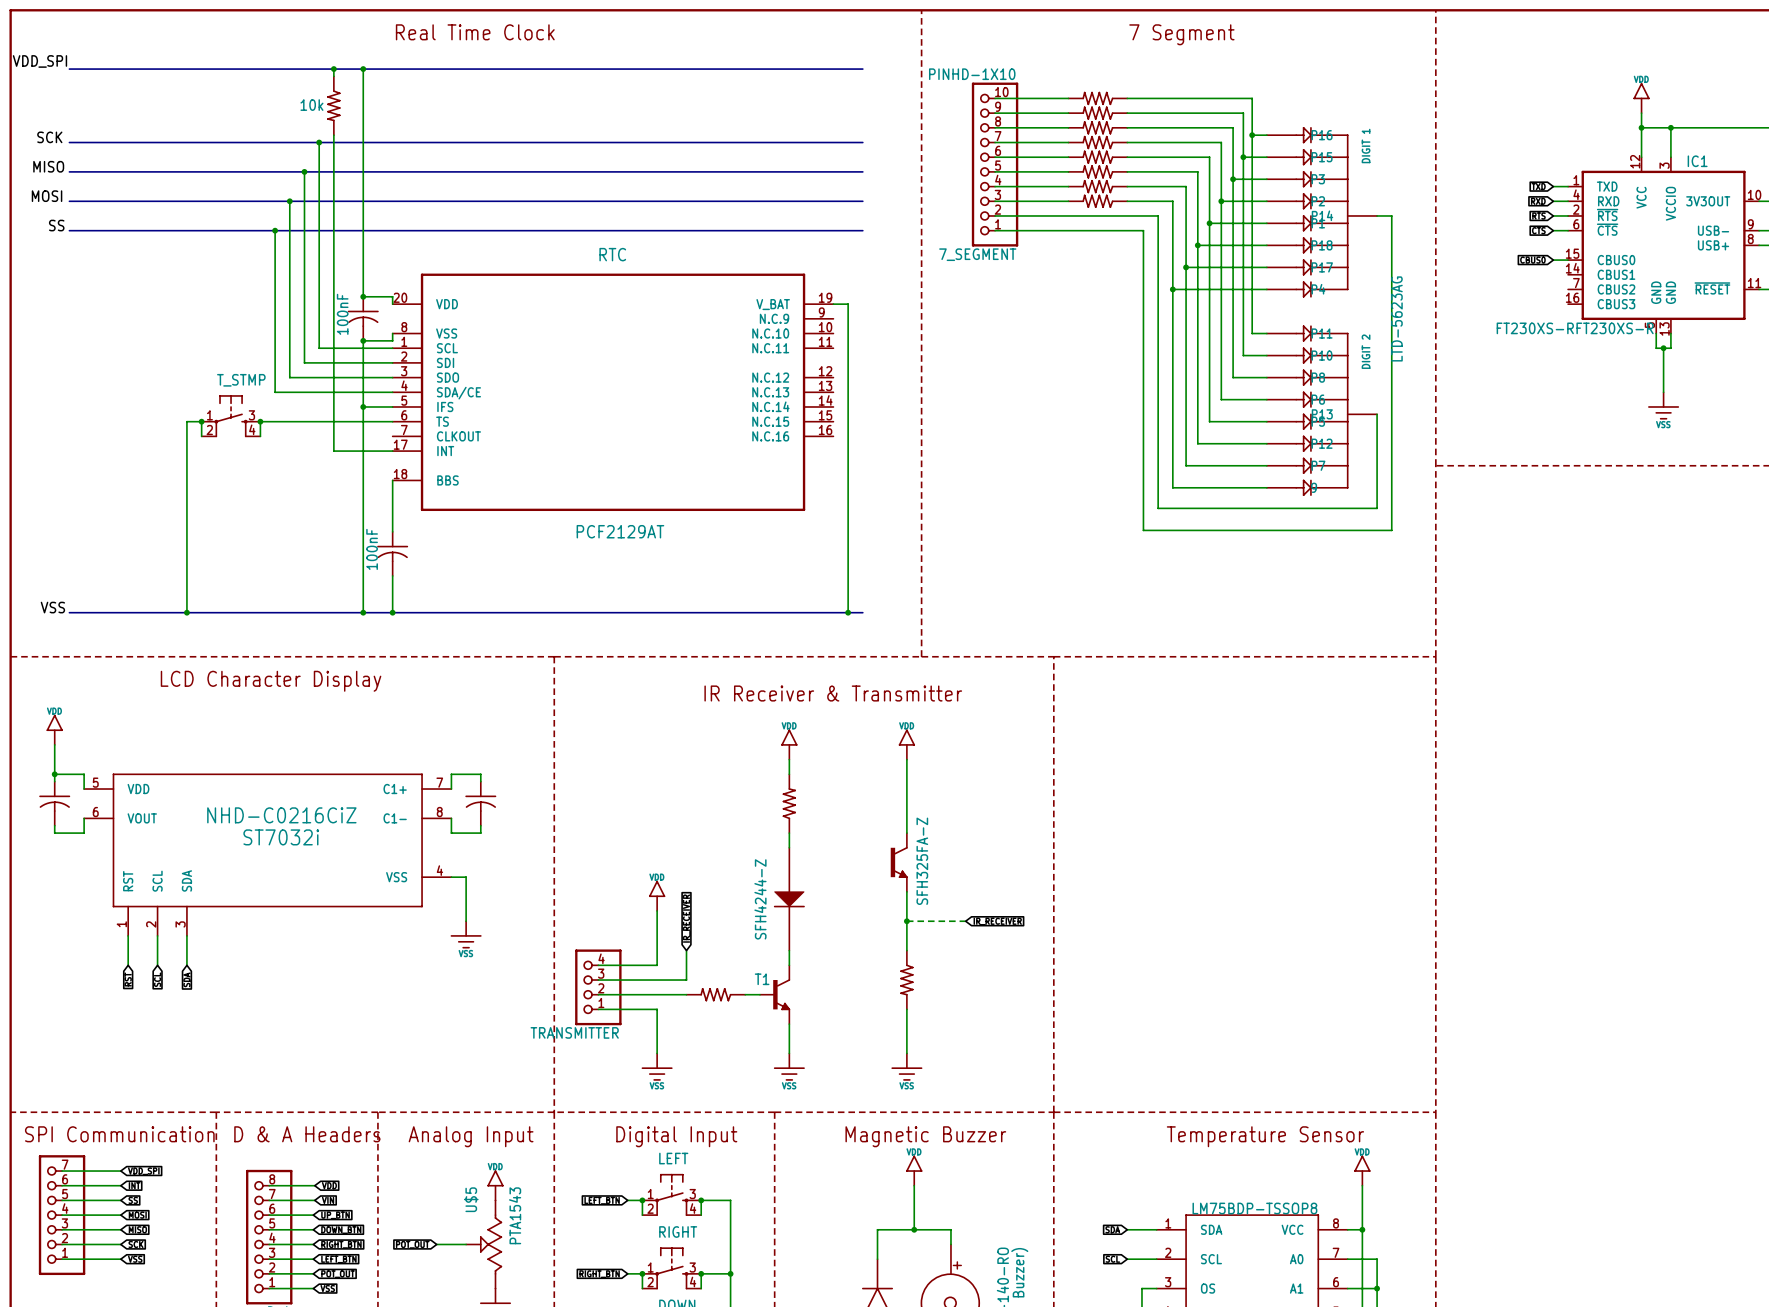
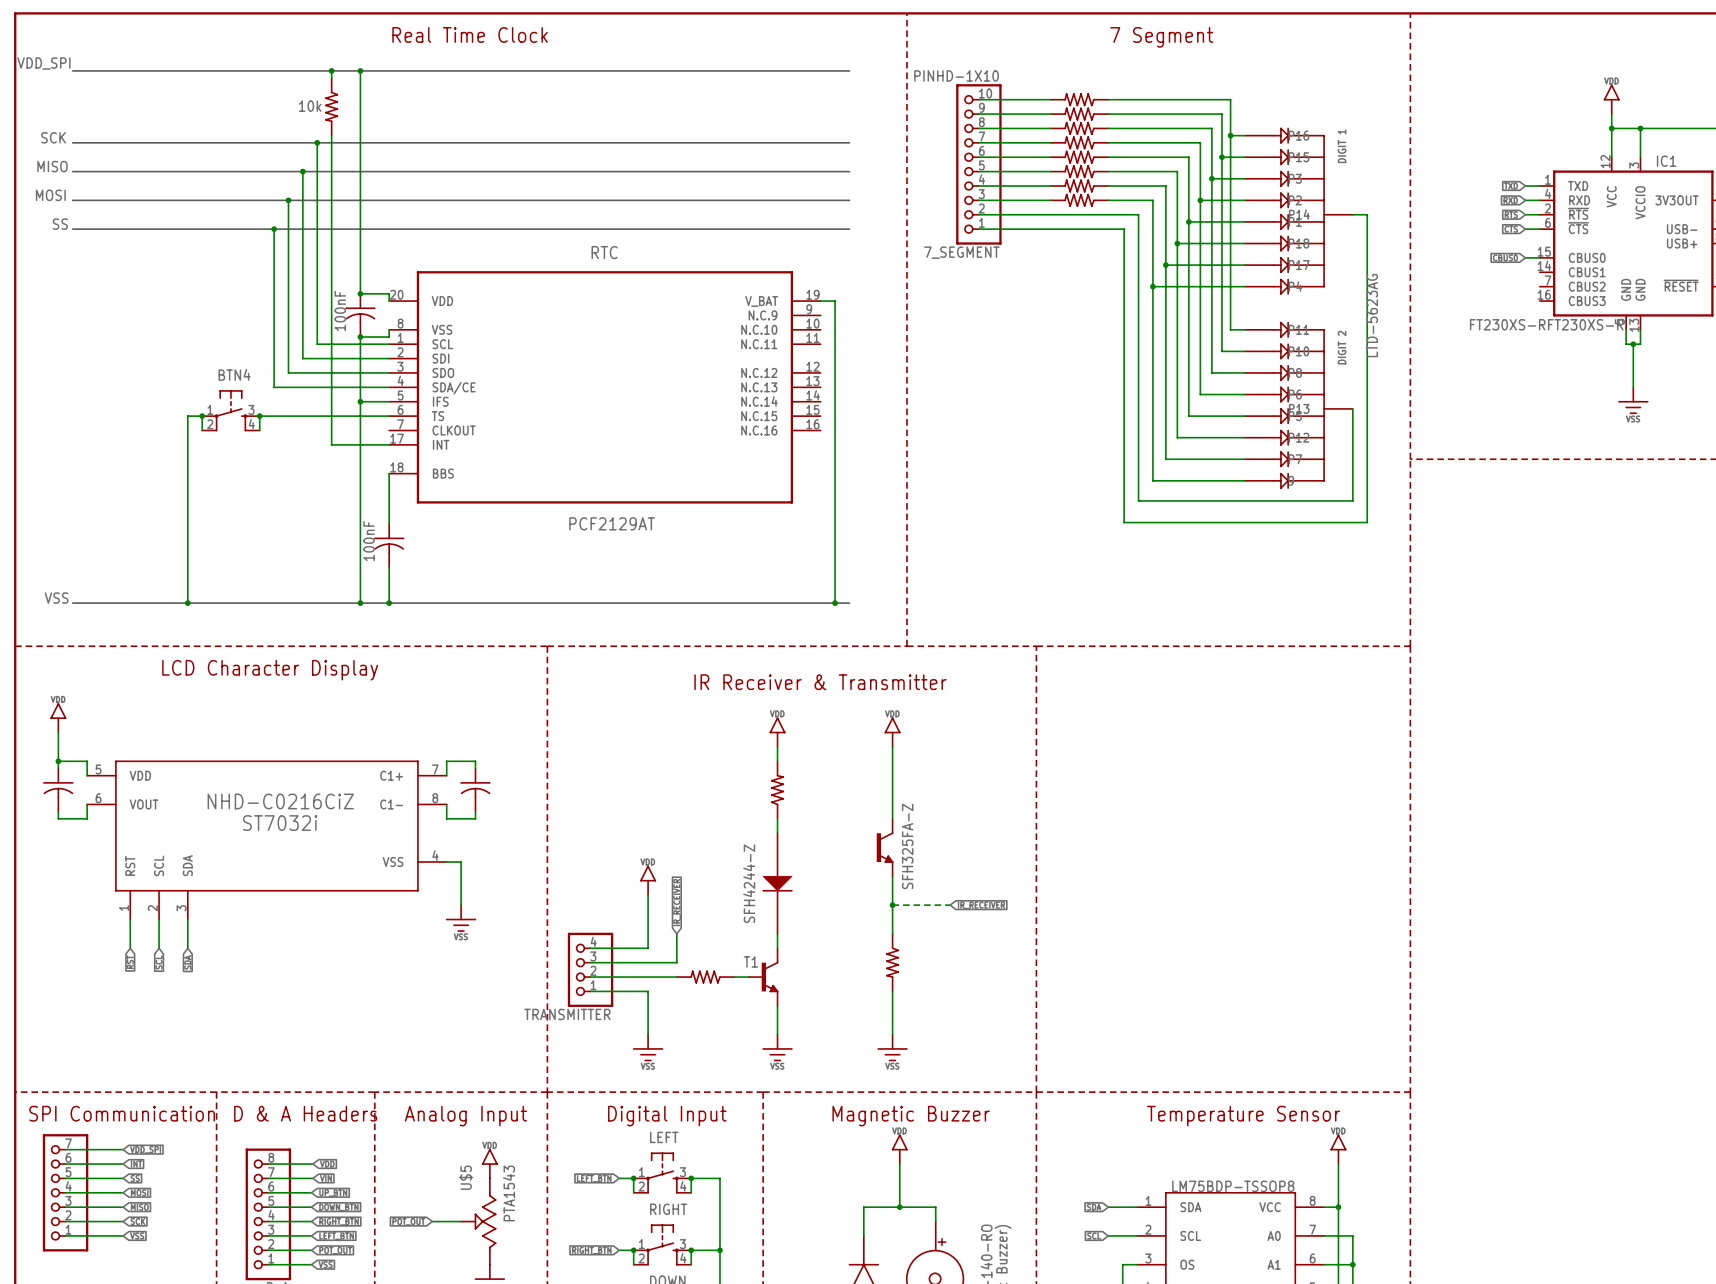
T_STMP name: T_STMP (241, 380) -> BTN4 (234, 374)

